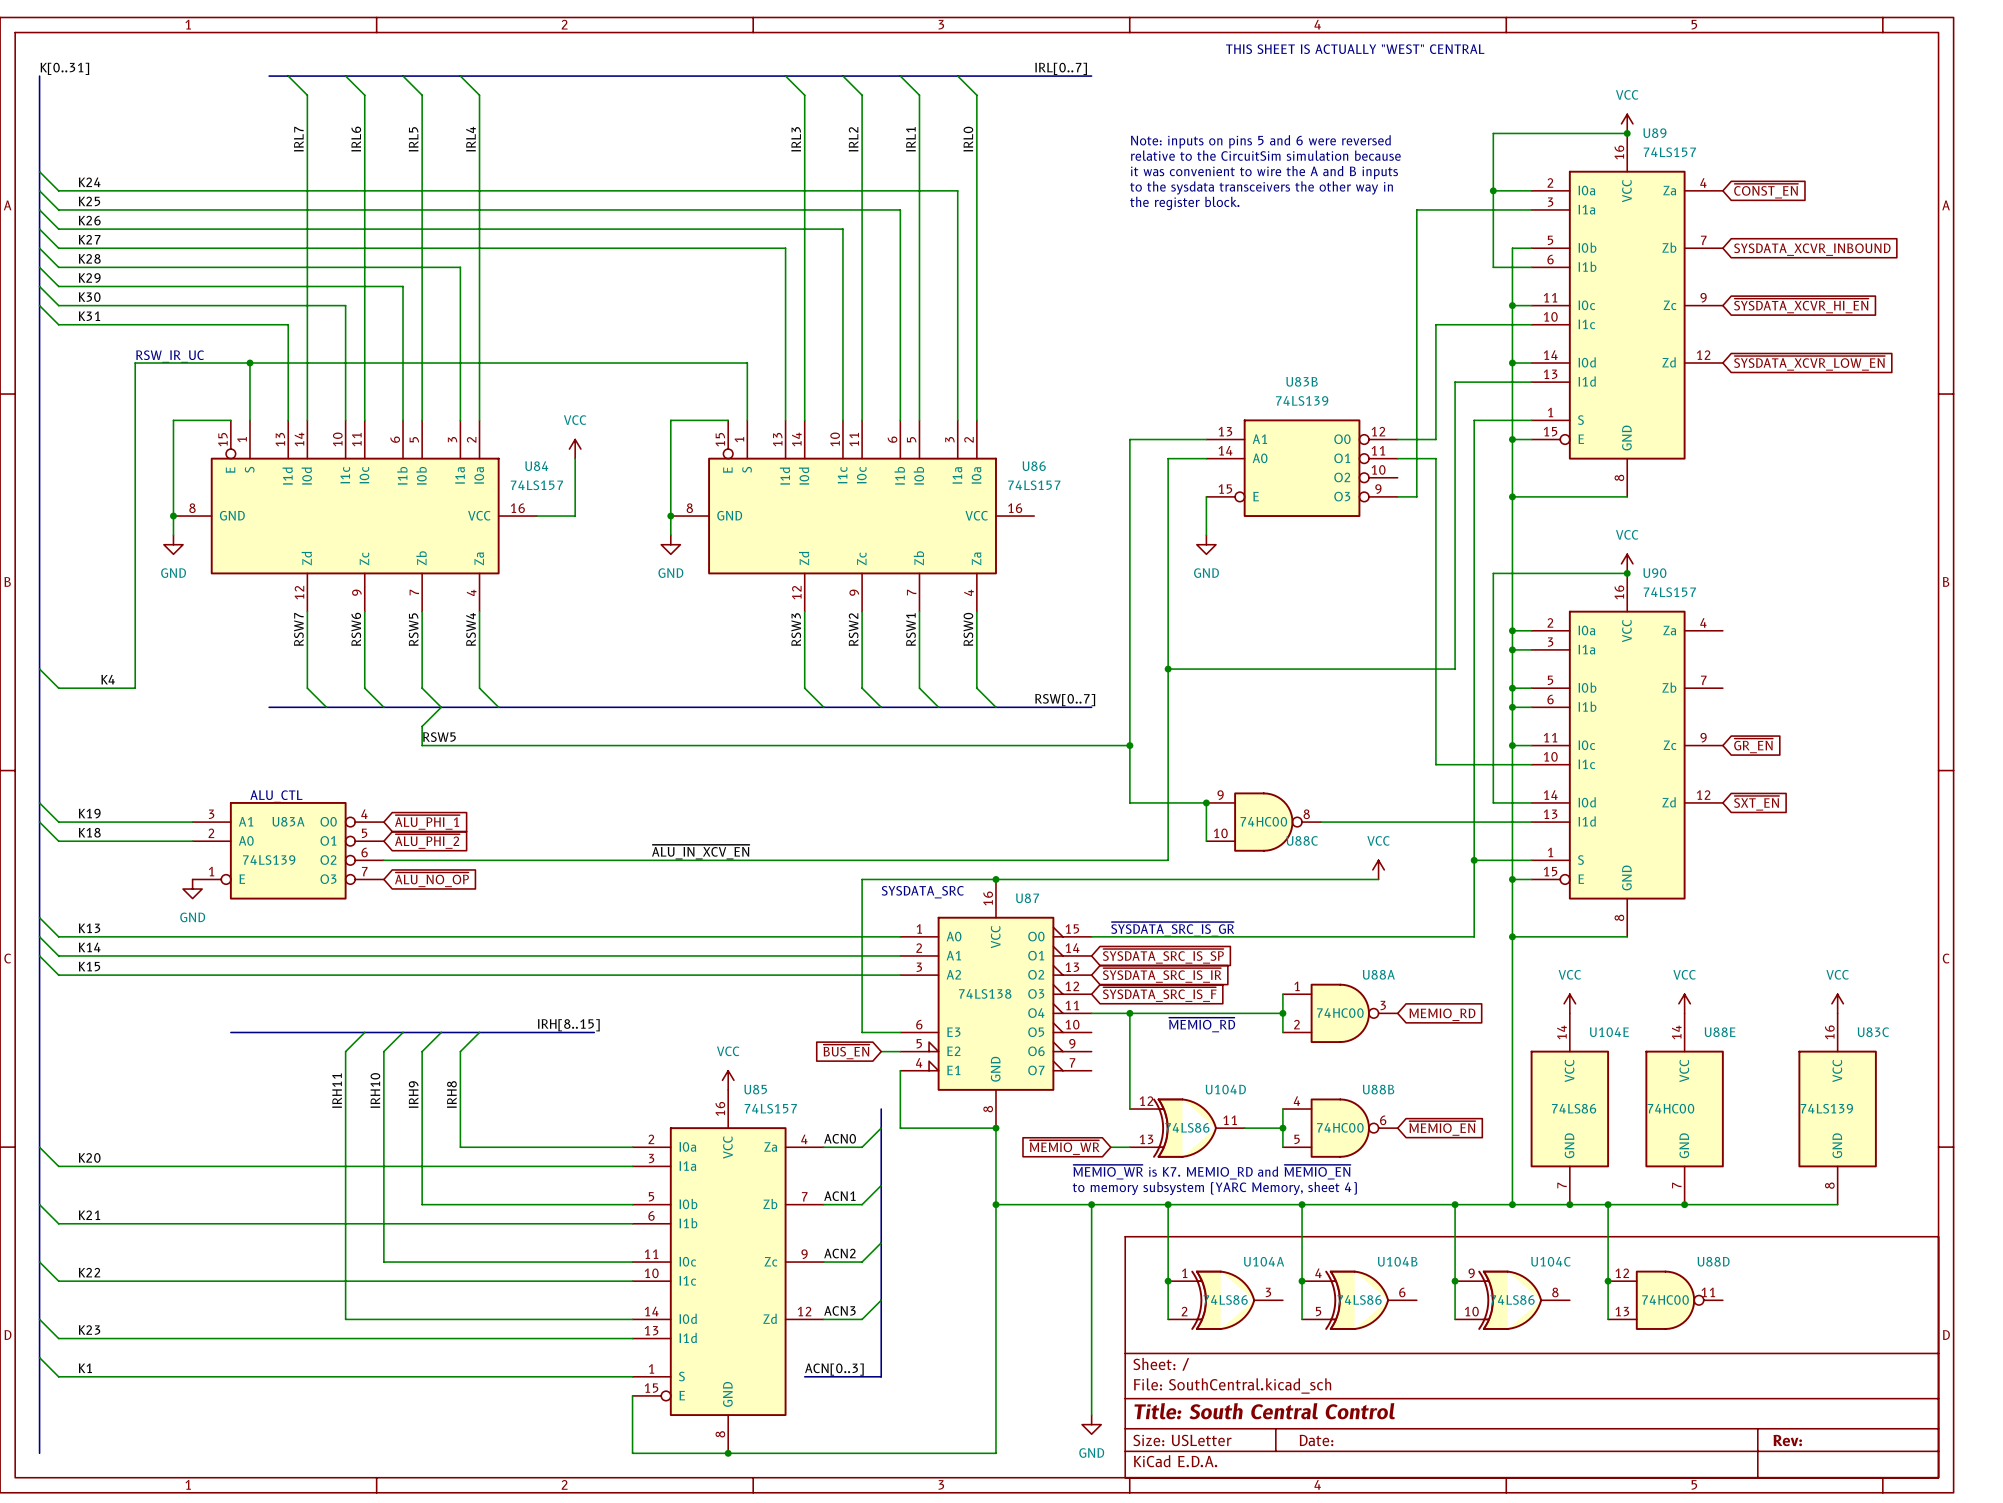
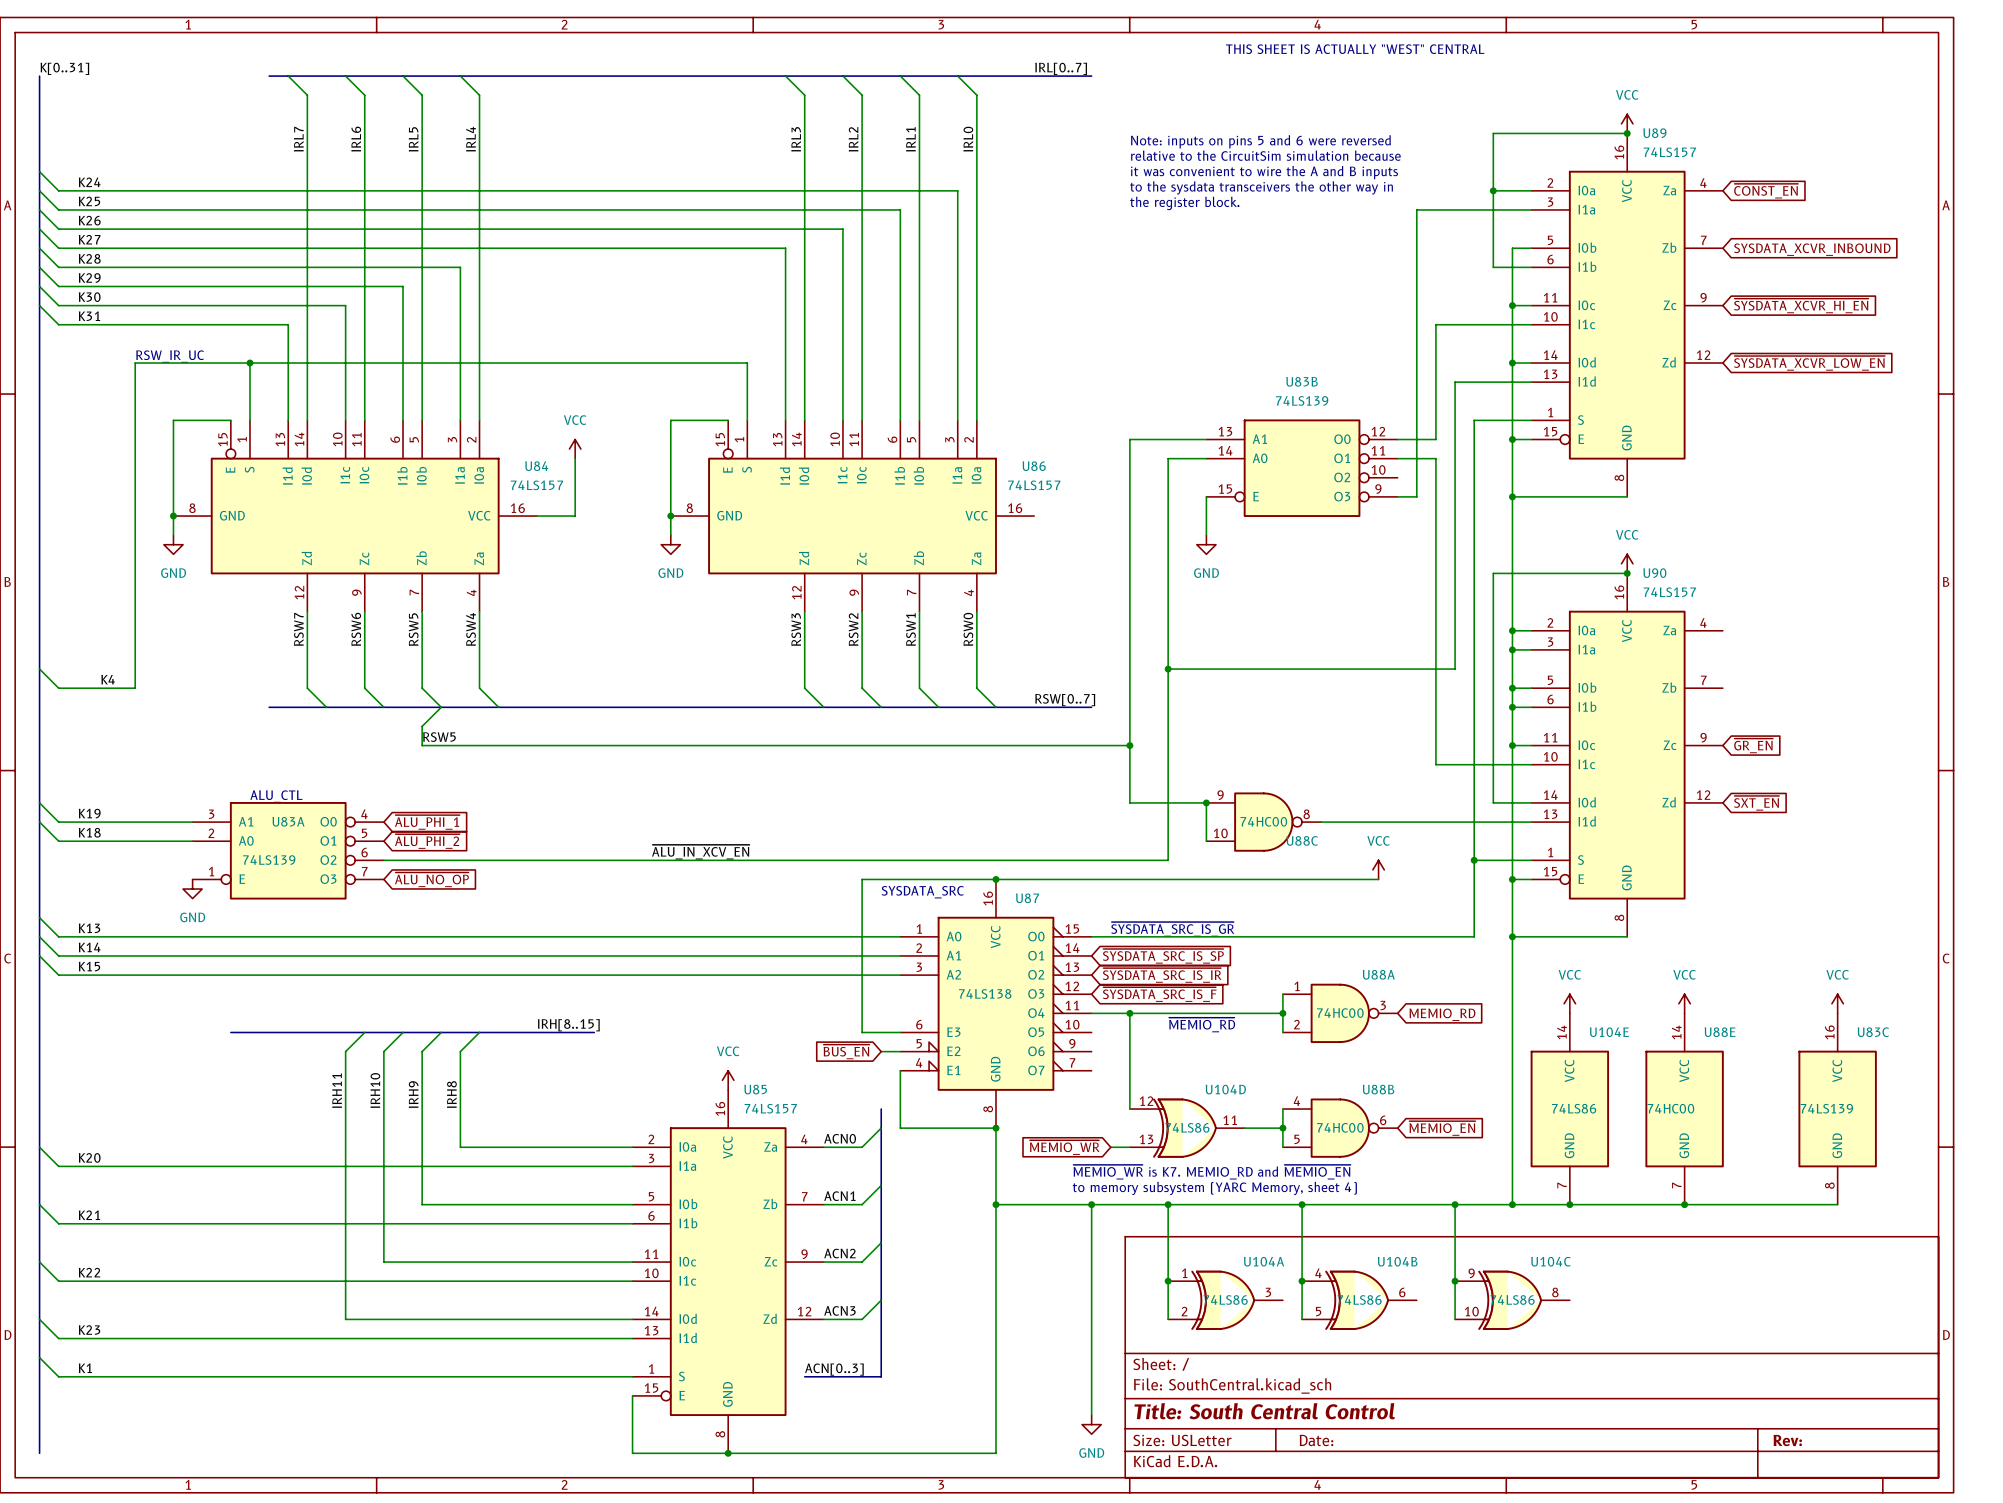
wire: (1608, 1204) (1608, 1319) -> none
junction: (1608, 1204) -> none
junction: (1608, 1281) -> none
U88D: 74HC00 (1665, 1300) -> none

